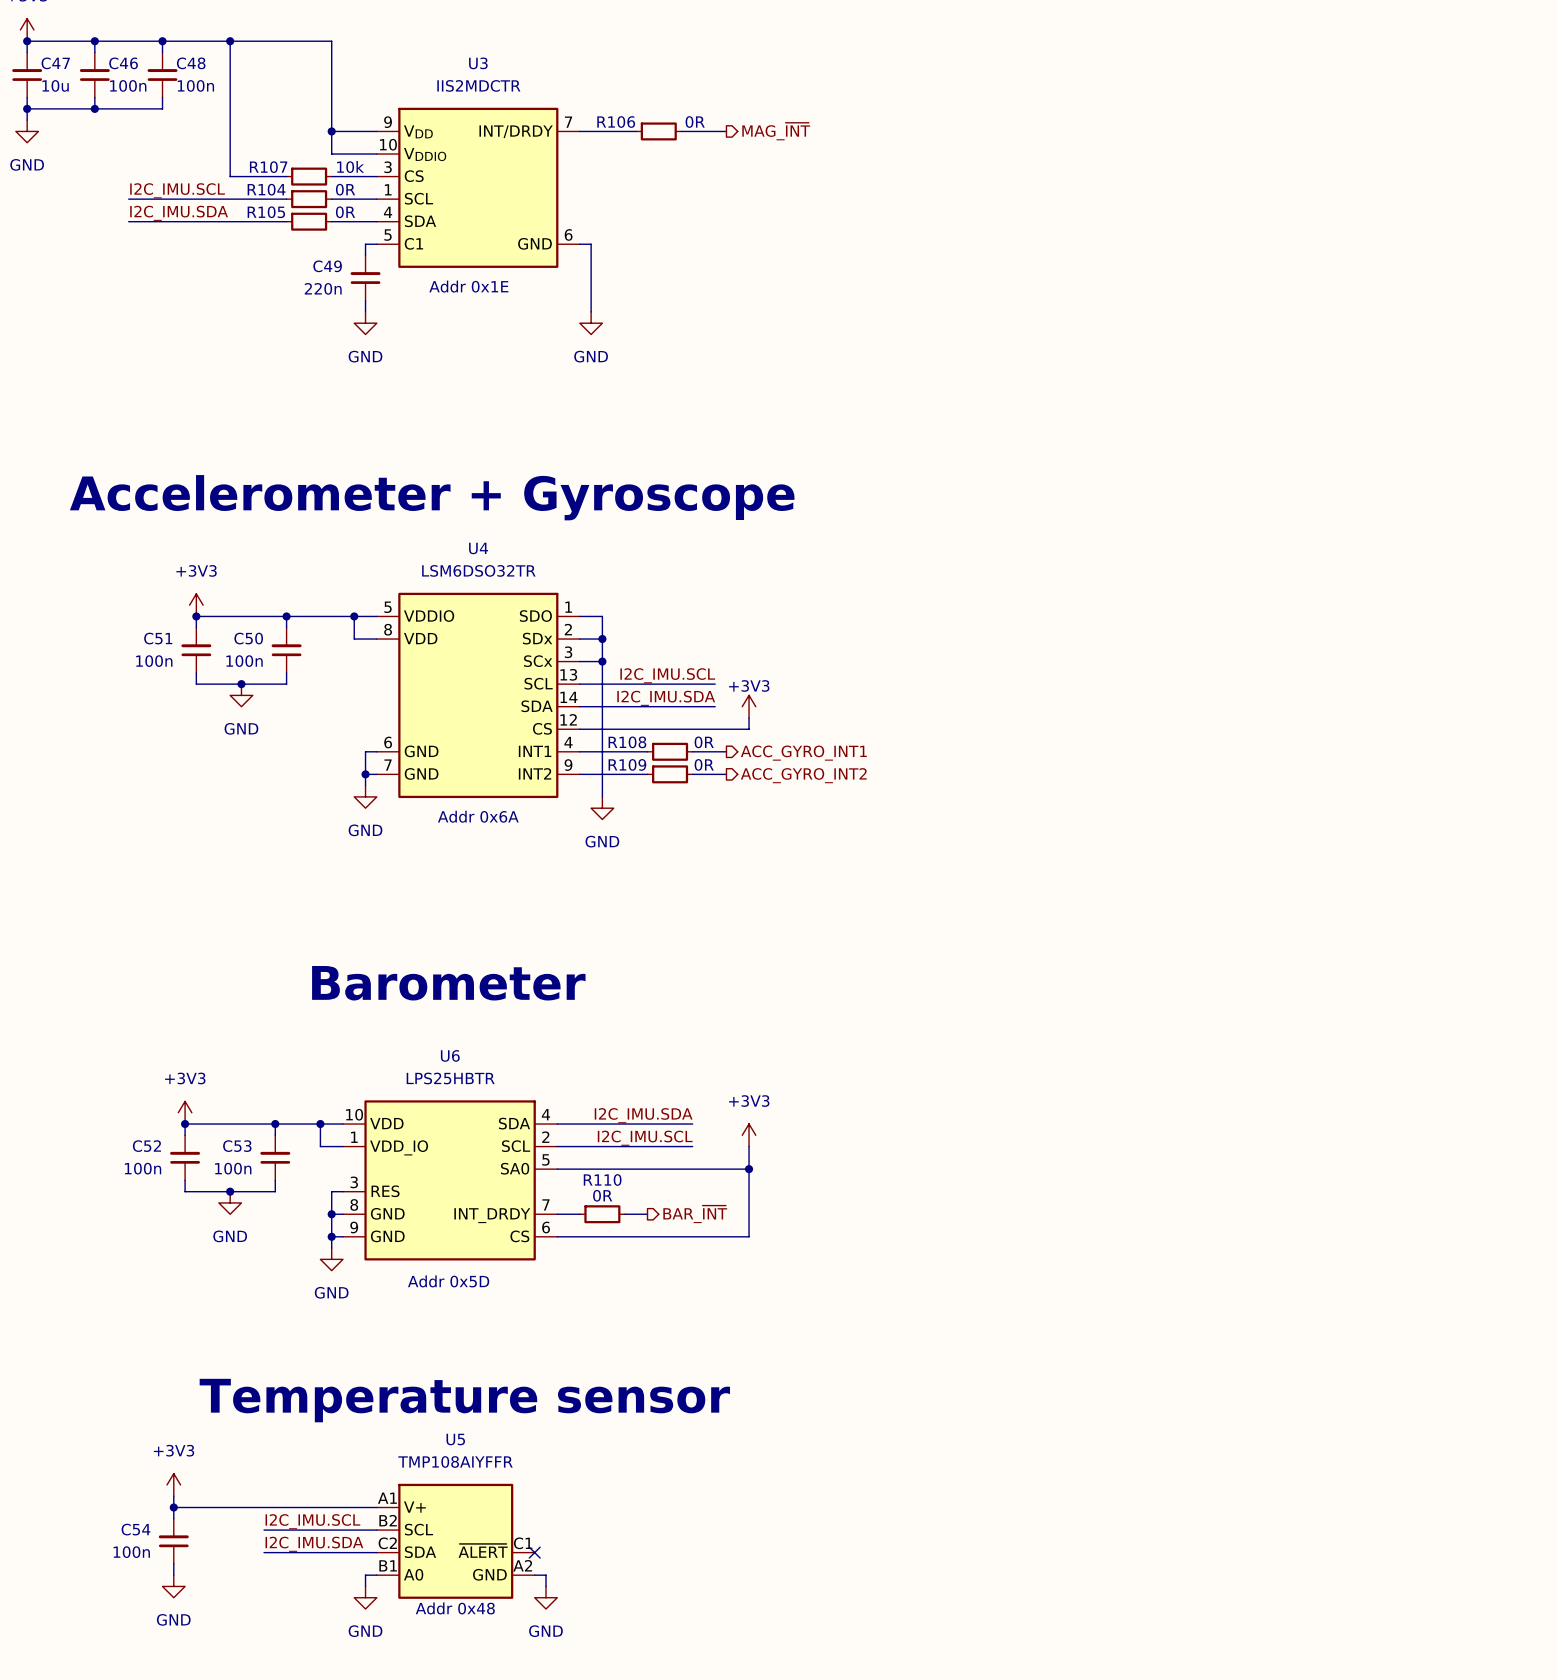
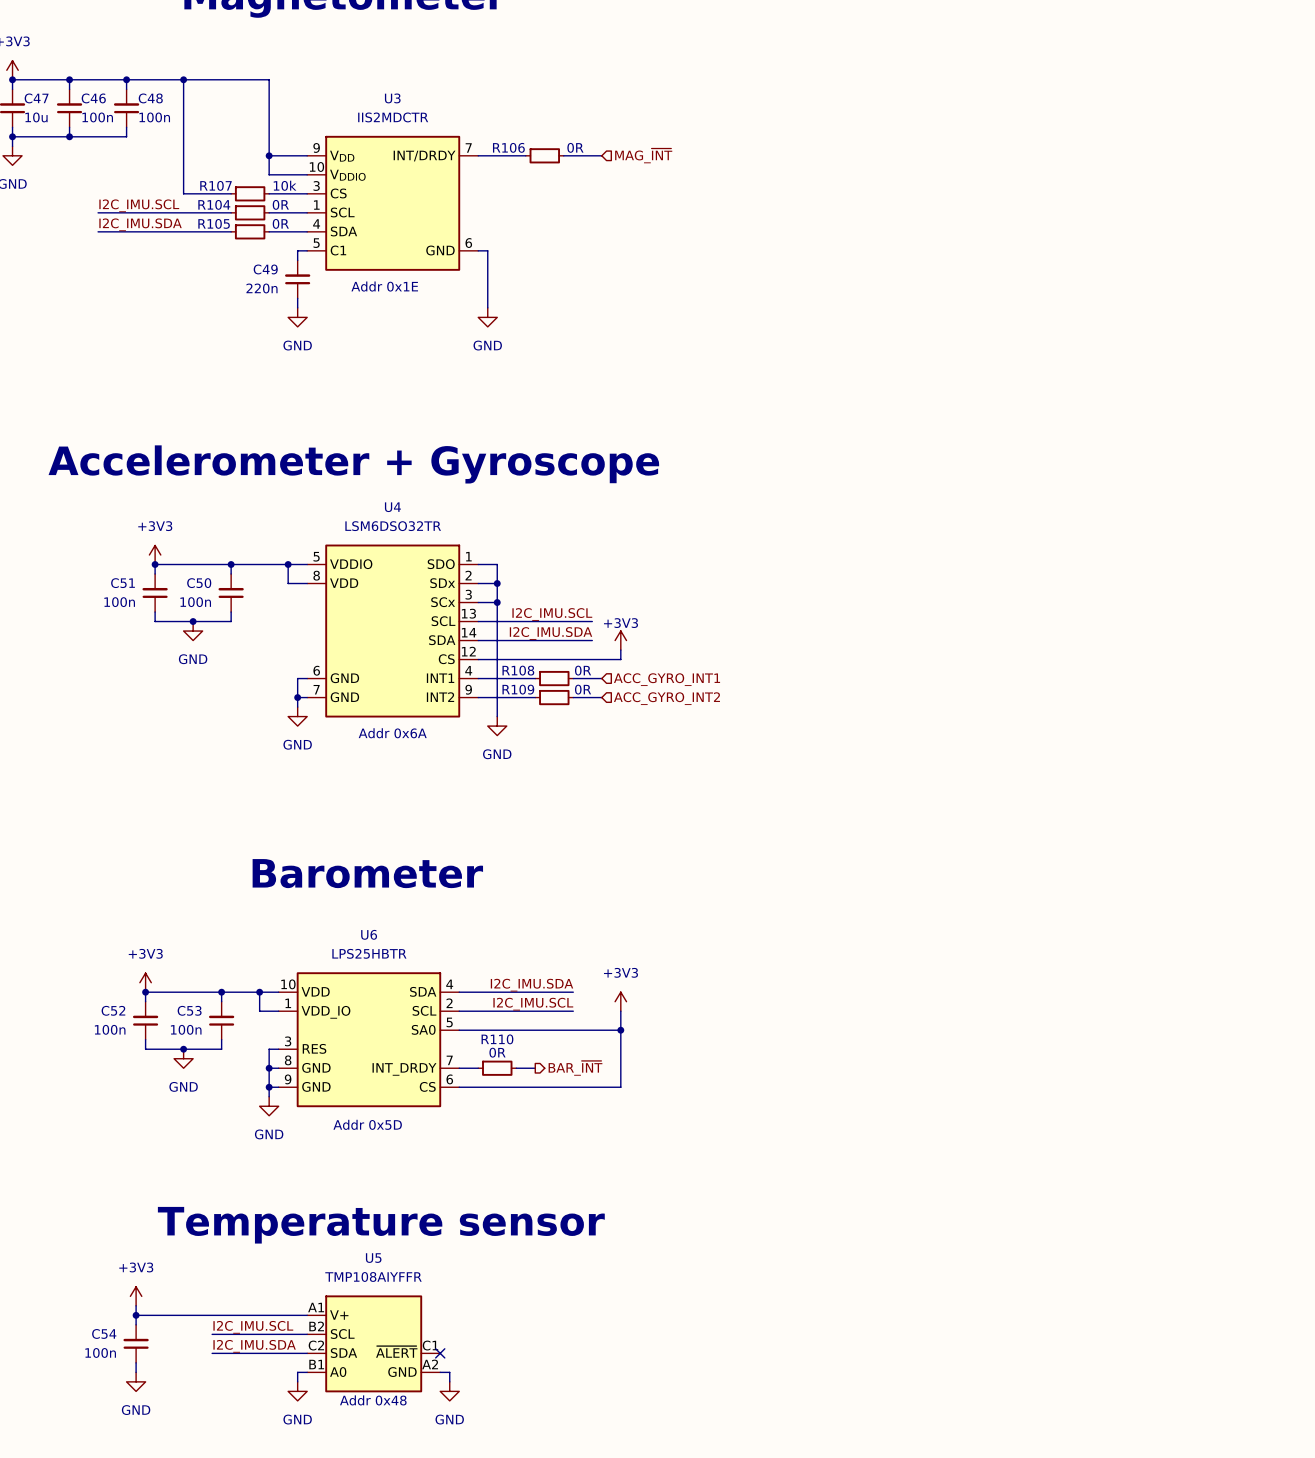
hierarchical label shape: output (776, 131) -> input (643, 155)
hierarchical label shape: output (803, 753) -> input (667, 679)
hierarchical label shape: output (803, 775) -> input (666, 698)

